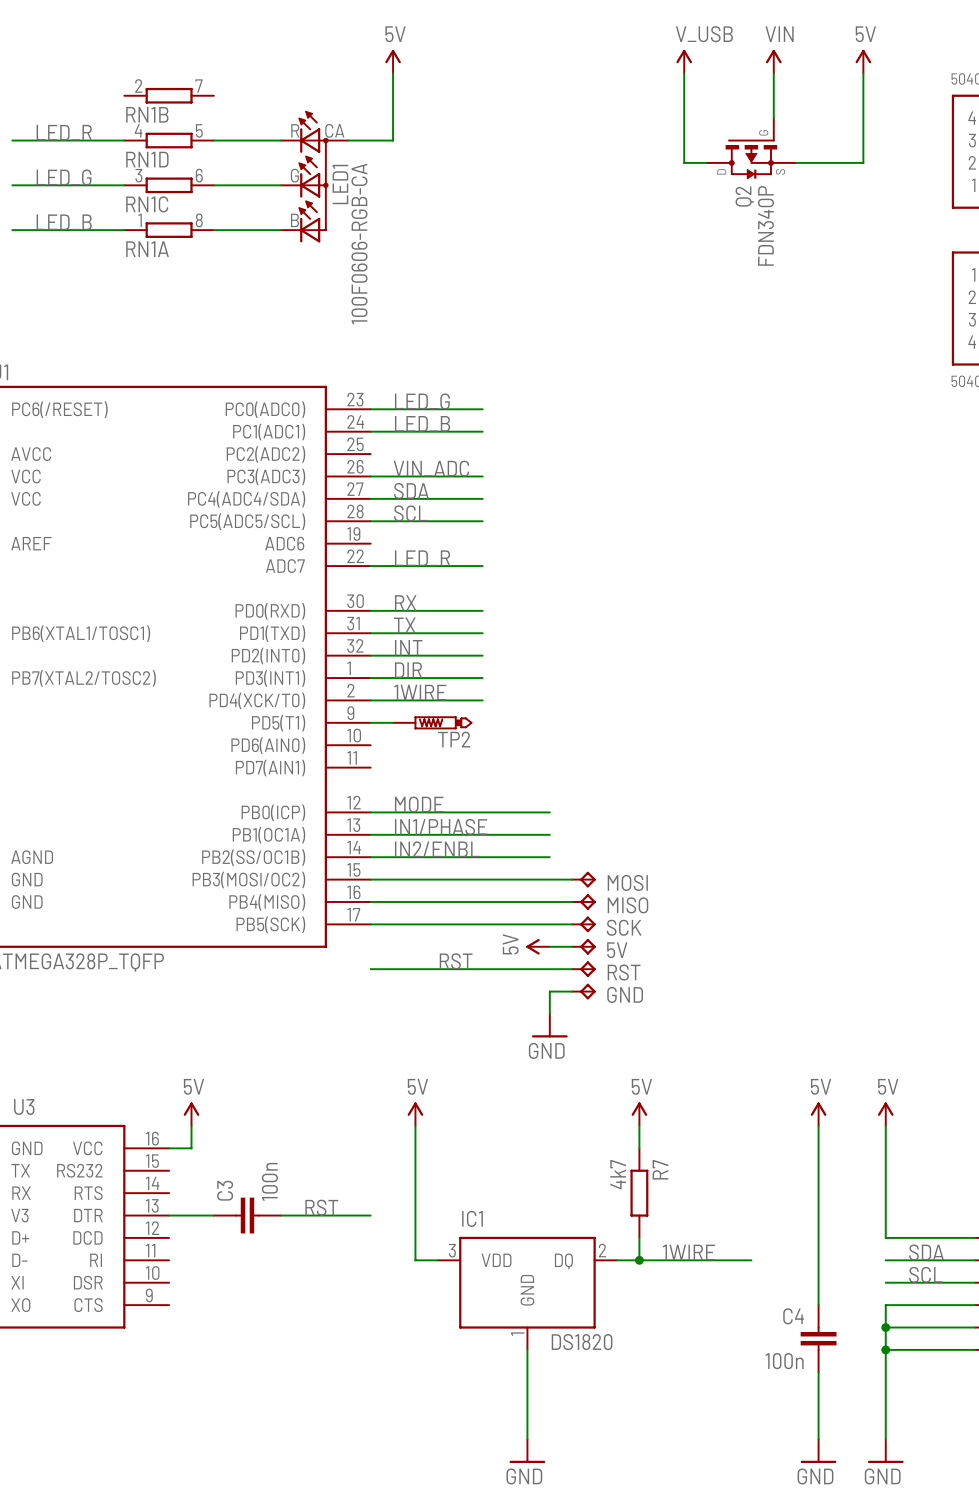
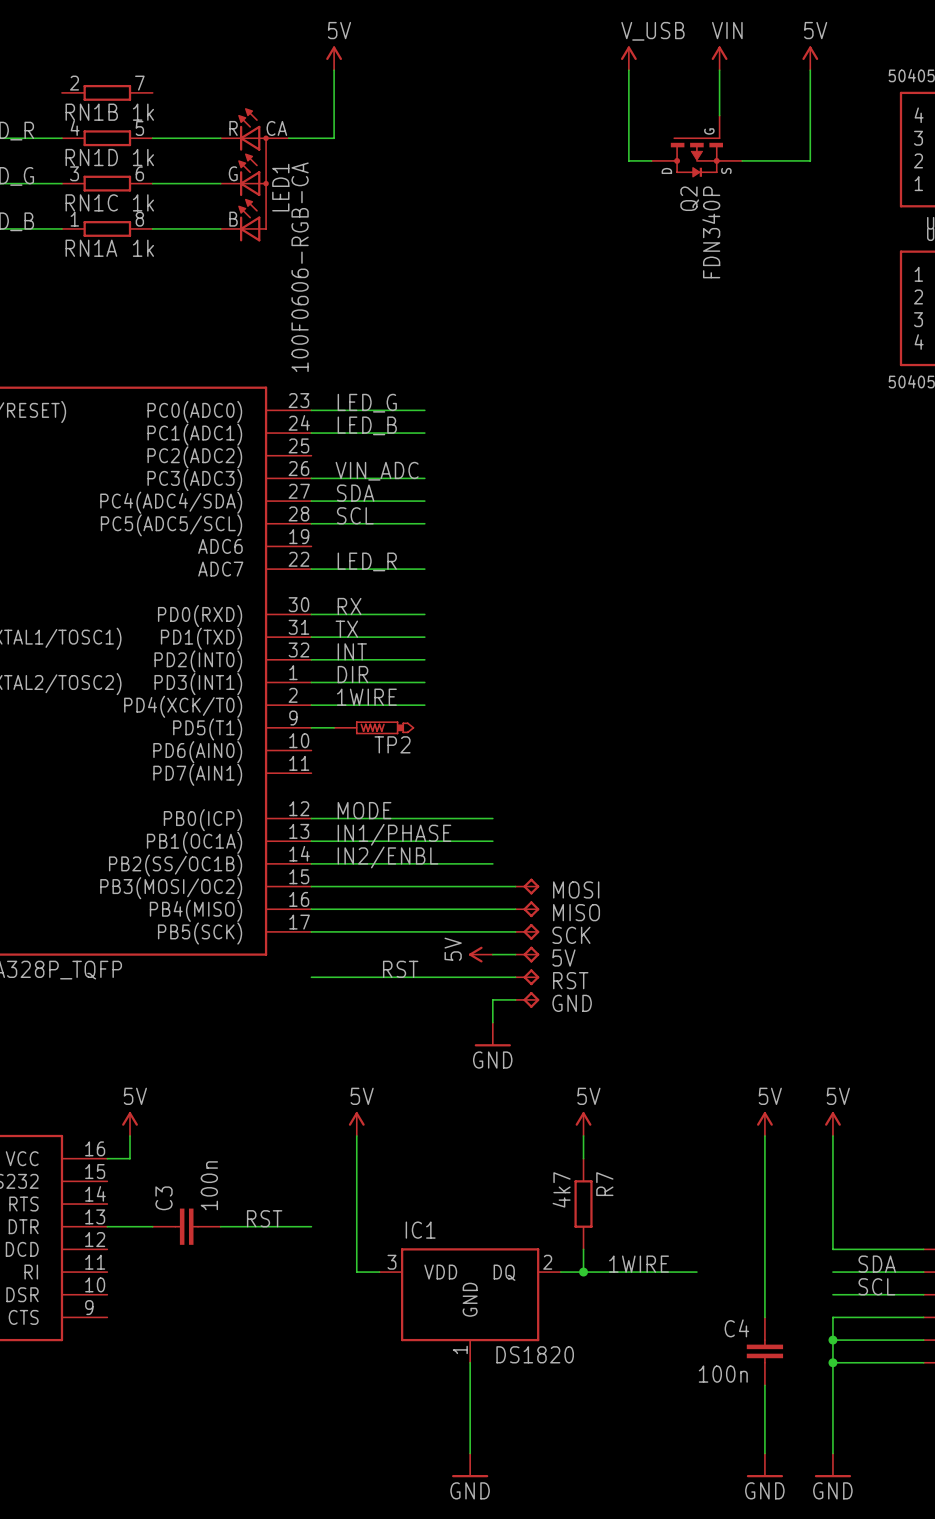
RN1B value: none -> 1k (143, 112)
RN1D value: none -> 1k (143, 157)
RN1C value: none -> 1k (143, 202)
RN1A value: none -> 1k (143, 248)

